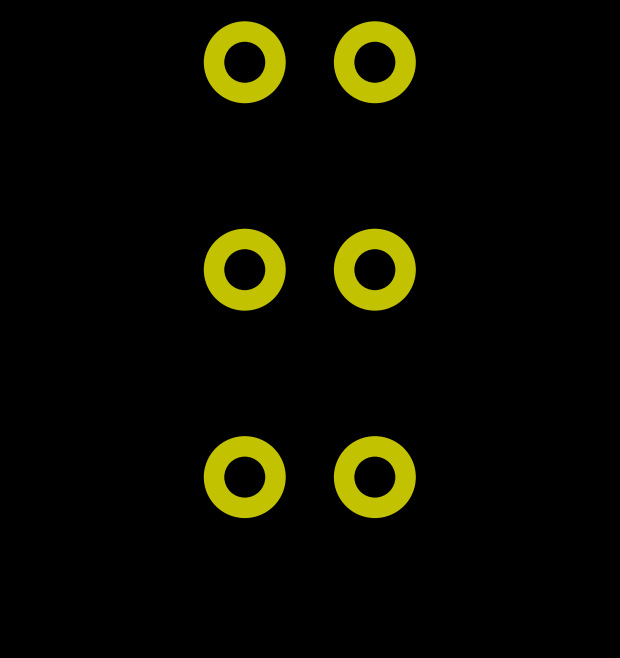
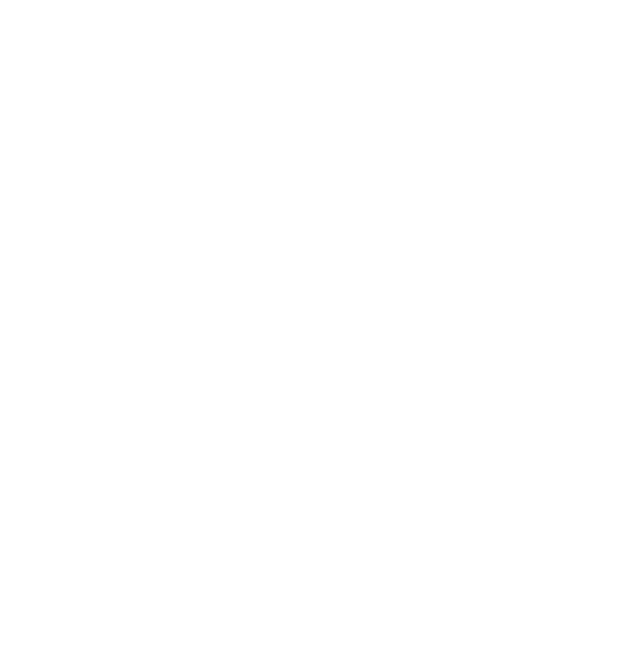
part: (309, 62) -> none
part: (309, 269) -> none
part: (309, 477) -> none

